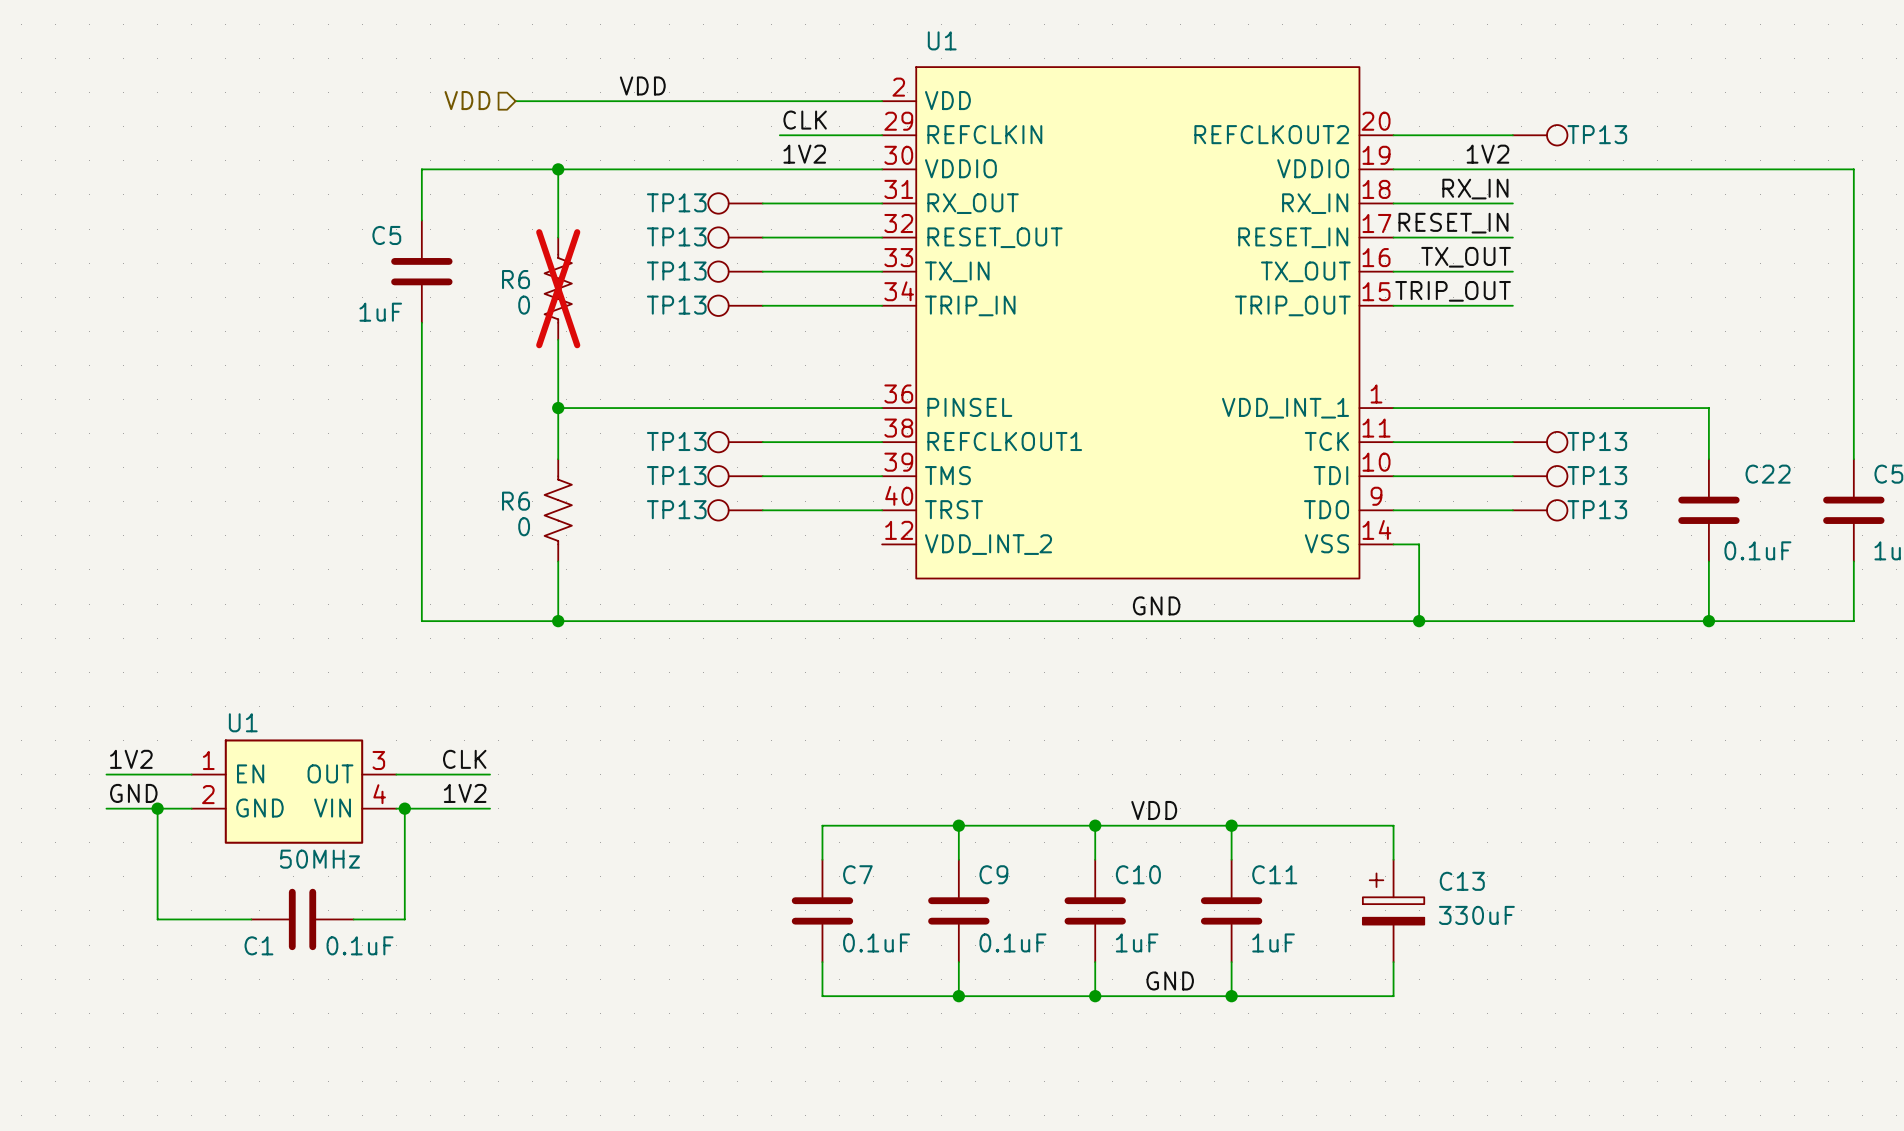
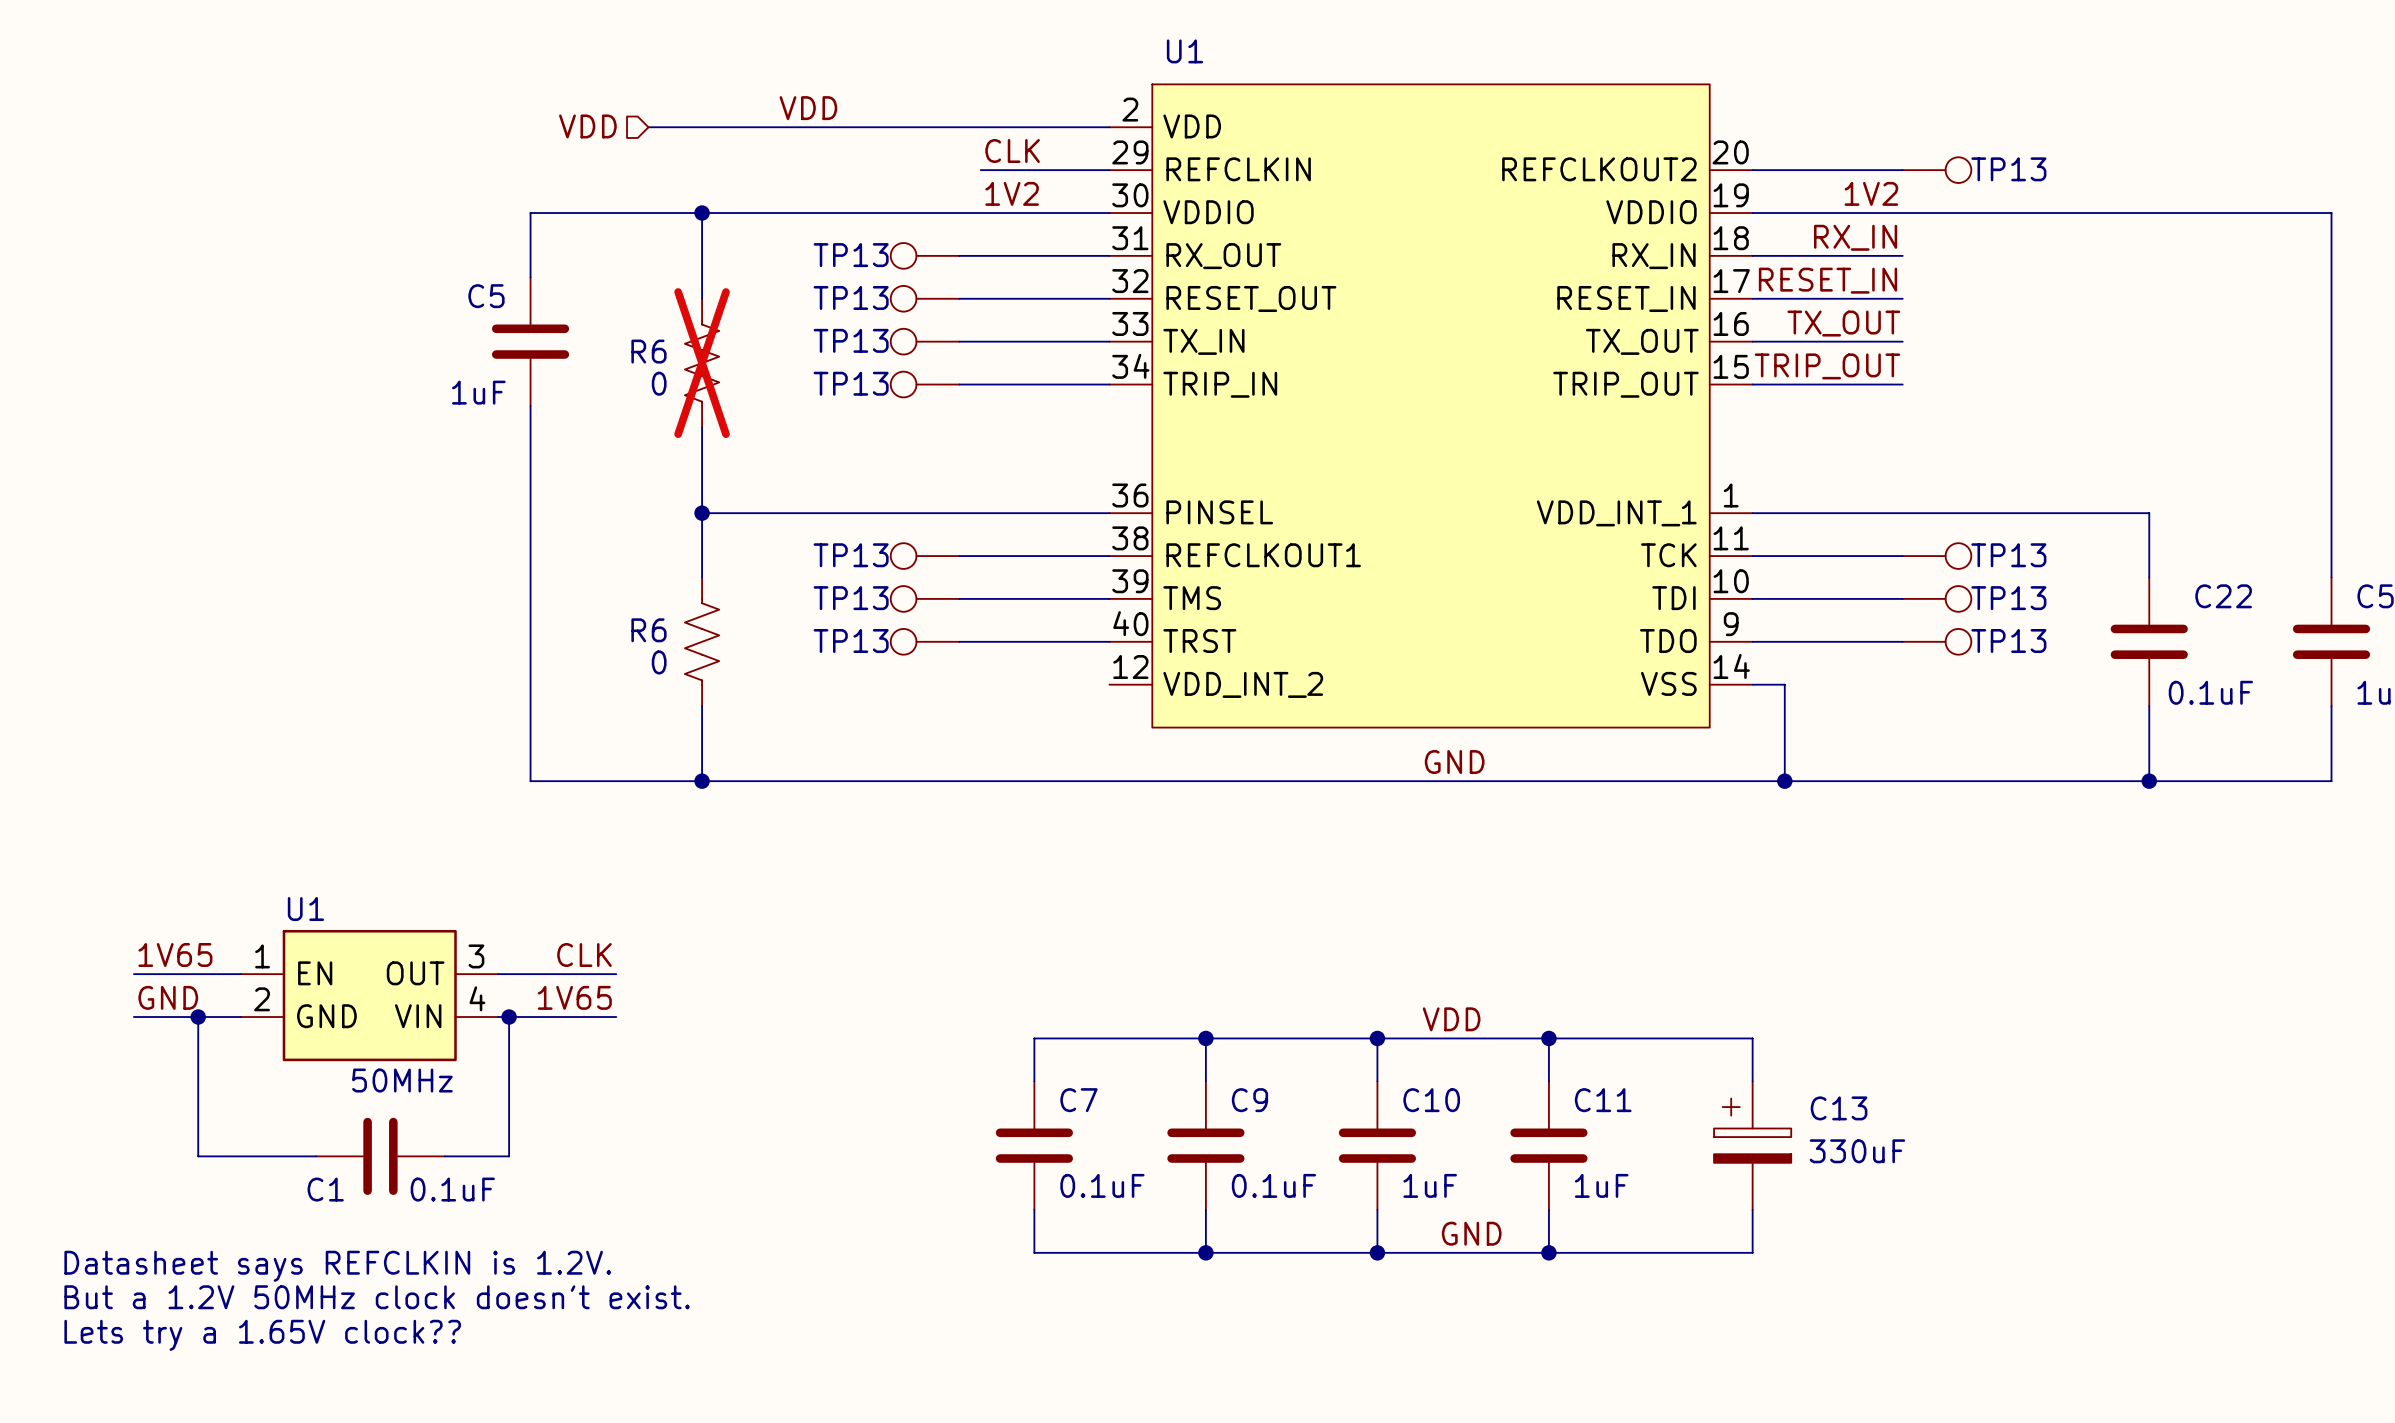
label: 1V2 (131, 759) -> 1V65 (175, 955)
label: 1V2 (465, 793) -> 1V65 (574, 997)
text: none -> Datasheet says REFCLKIN is 1.2V. (337, 1266)
text: none -> But a 1.2V 50MHz clock doesn't exist. (377, 1297)
text: none -> Lets try a 1.65V clock?? (262, 1335)

